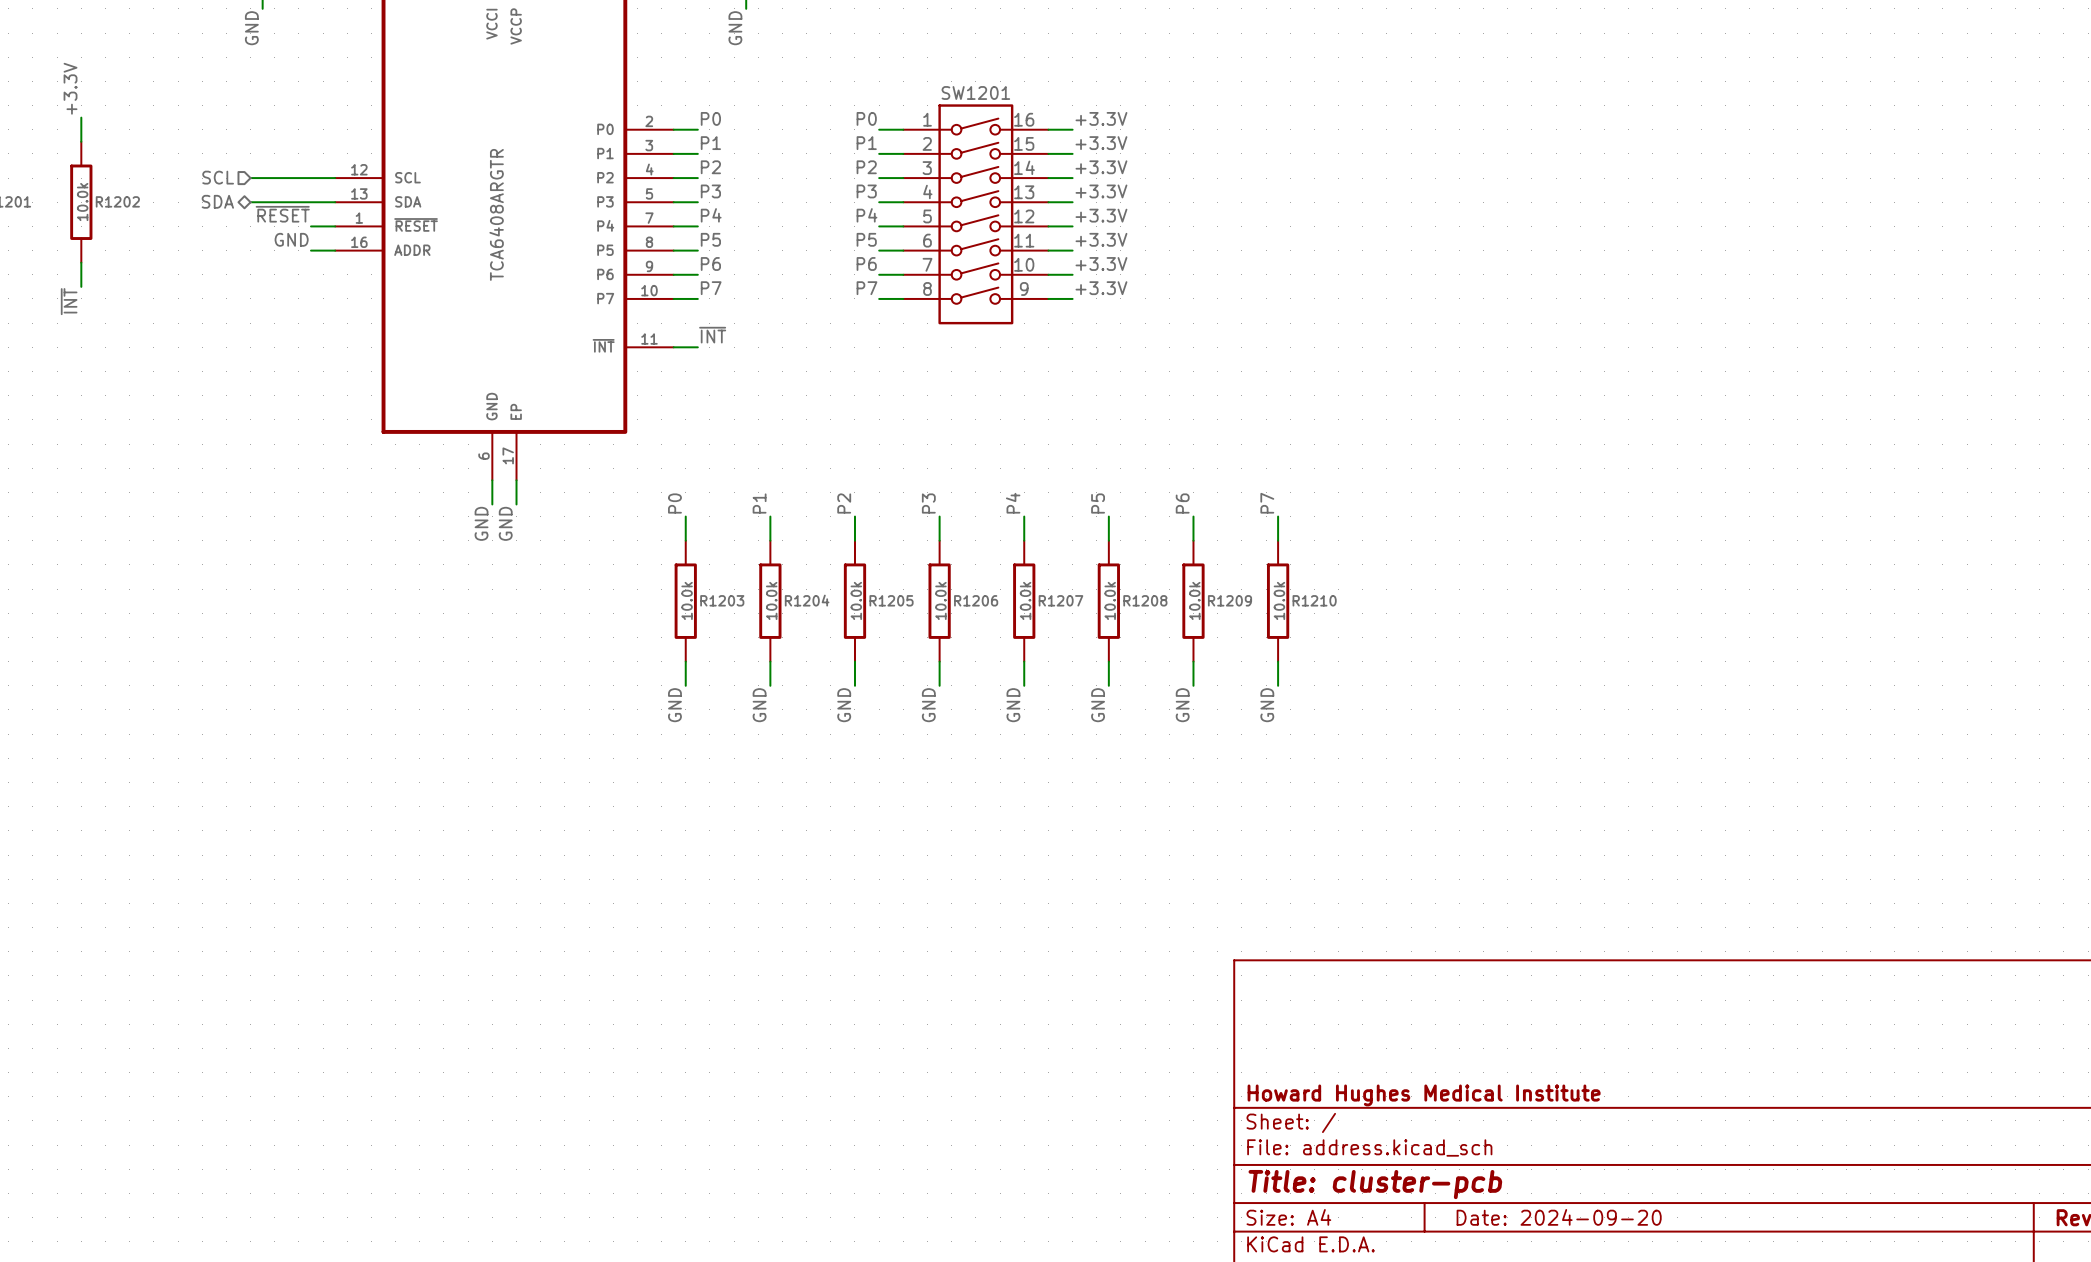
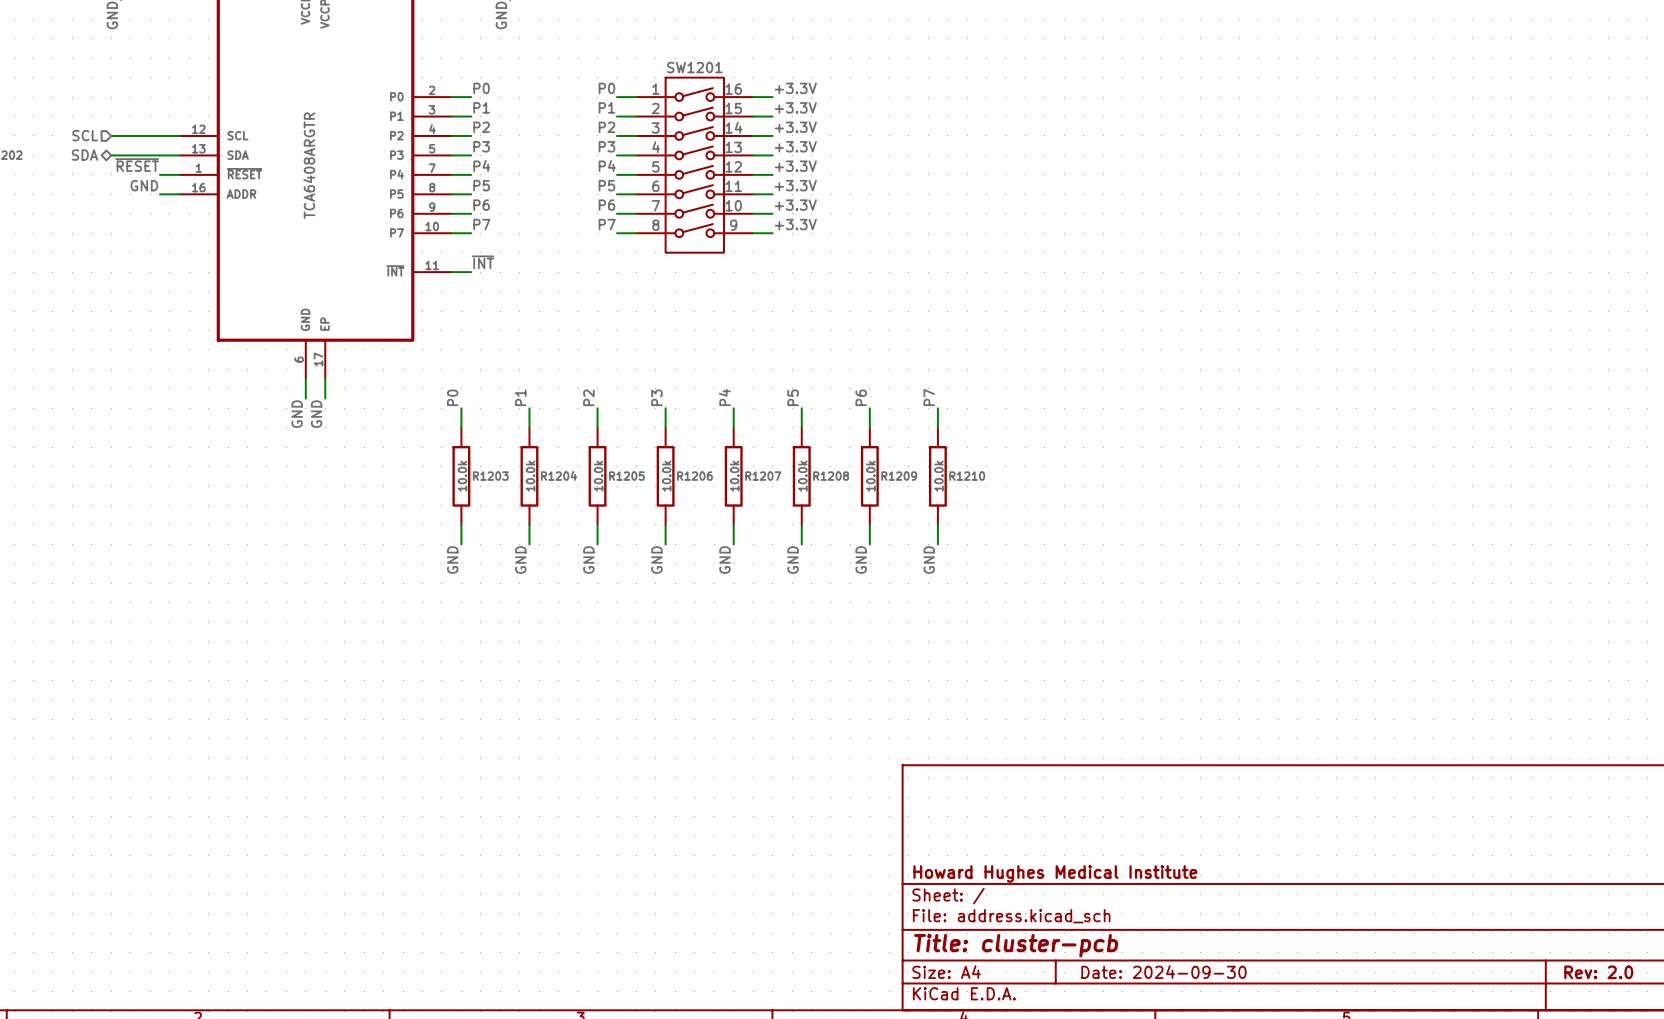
title block: Date: 2024-09-20 (1559, 1217) -> Date: 2024-09-30 (1164, 972)

